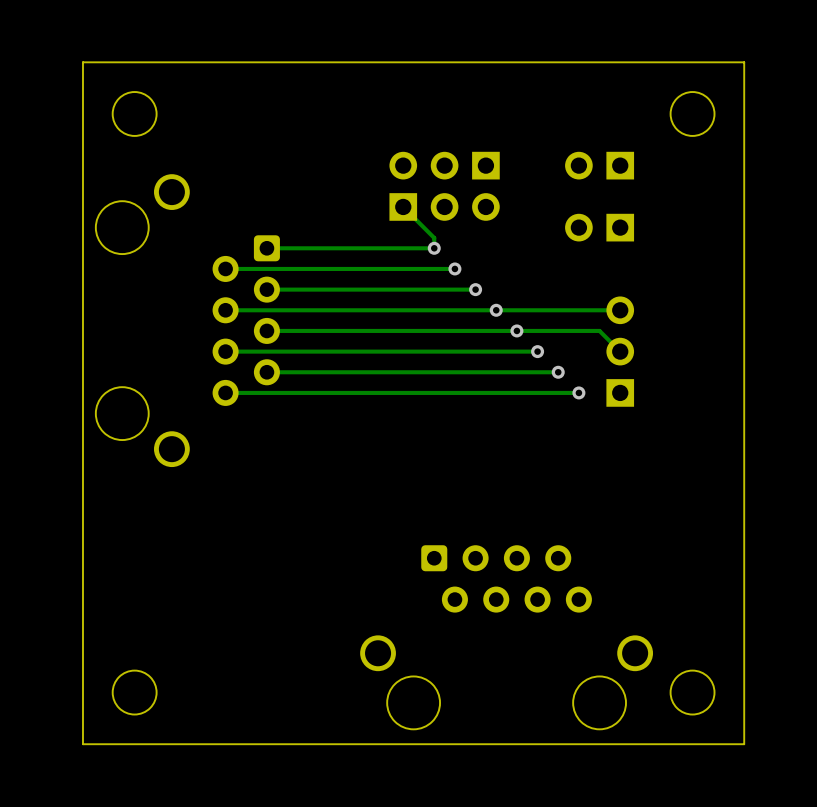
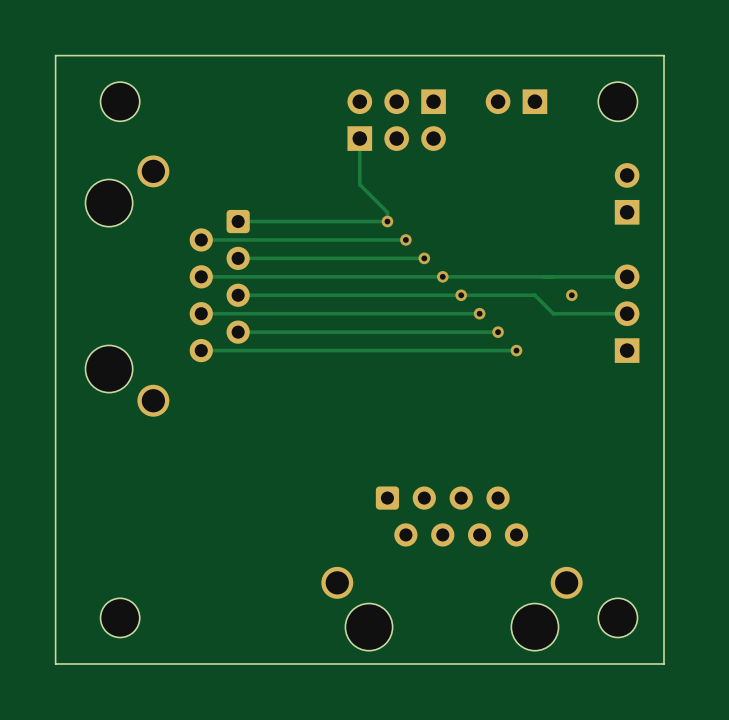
board edge: (82, 62) (82, 744) -> (74, 55) (55, 55) (55, 663) (74, 663)
track: none -> (359, 138) (359, 184)
part rotation: 0° (444, 165) -> 180° (396, 138)
part position: (599, 165) -> (516, 101)
part rotation: 0° (444, 206) -> 180° (396, 101)
part position: (444, 206) -> (396, 101)
part: none -> (627, 193)
part: (599, 227) -> none
track: none -> (627, 276) (553, 276)
via: none -> (571, 295)
part position: (620, 351) -> (627, 313)
track: none -> (627, 313) (553, 313)

